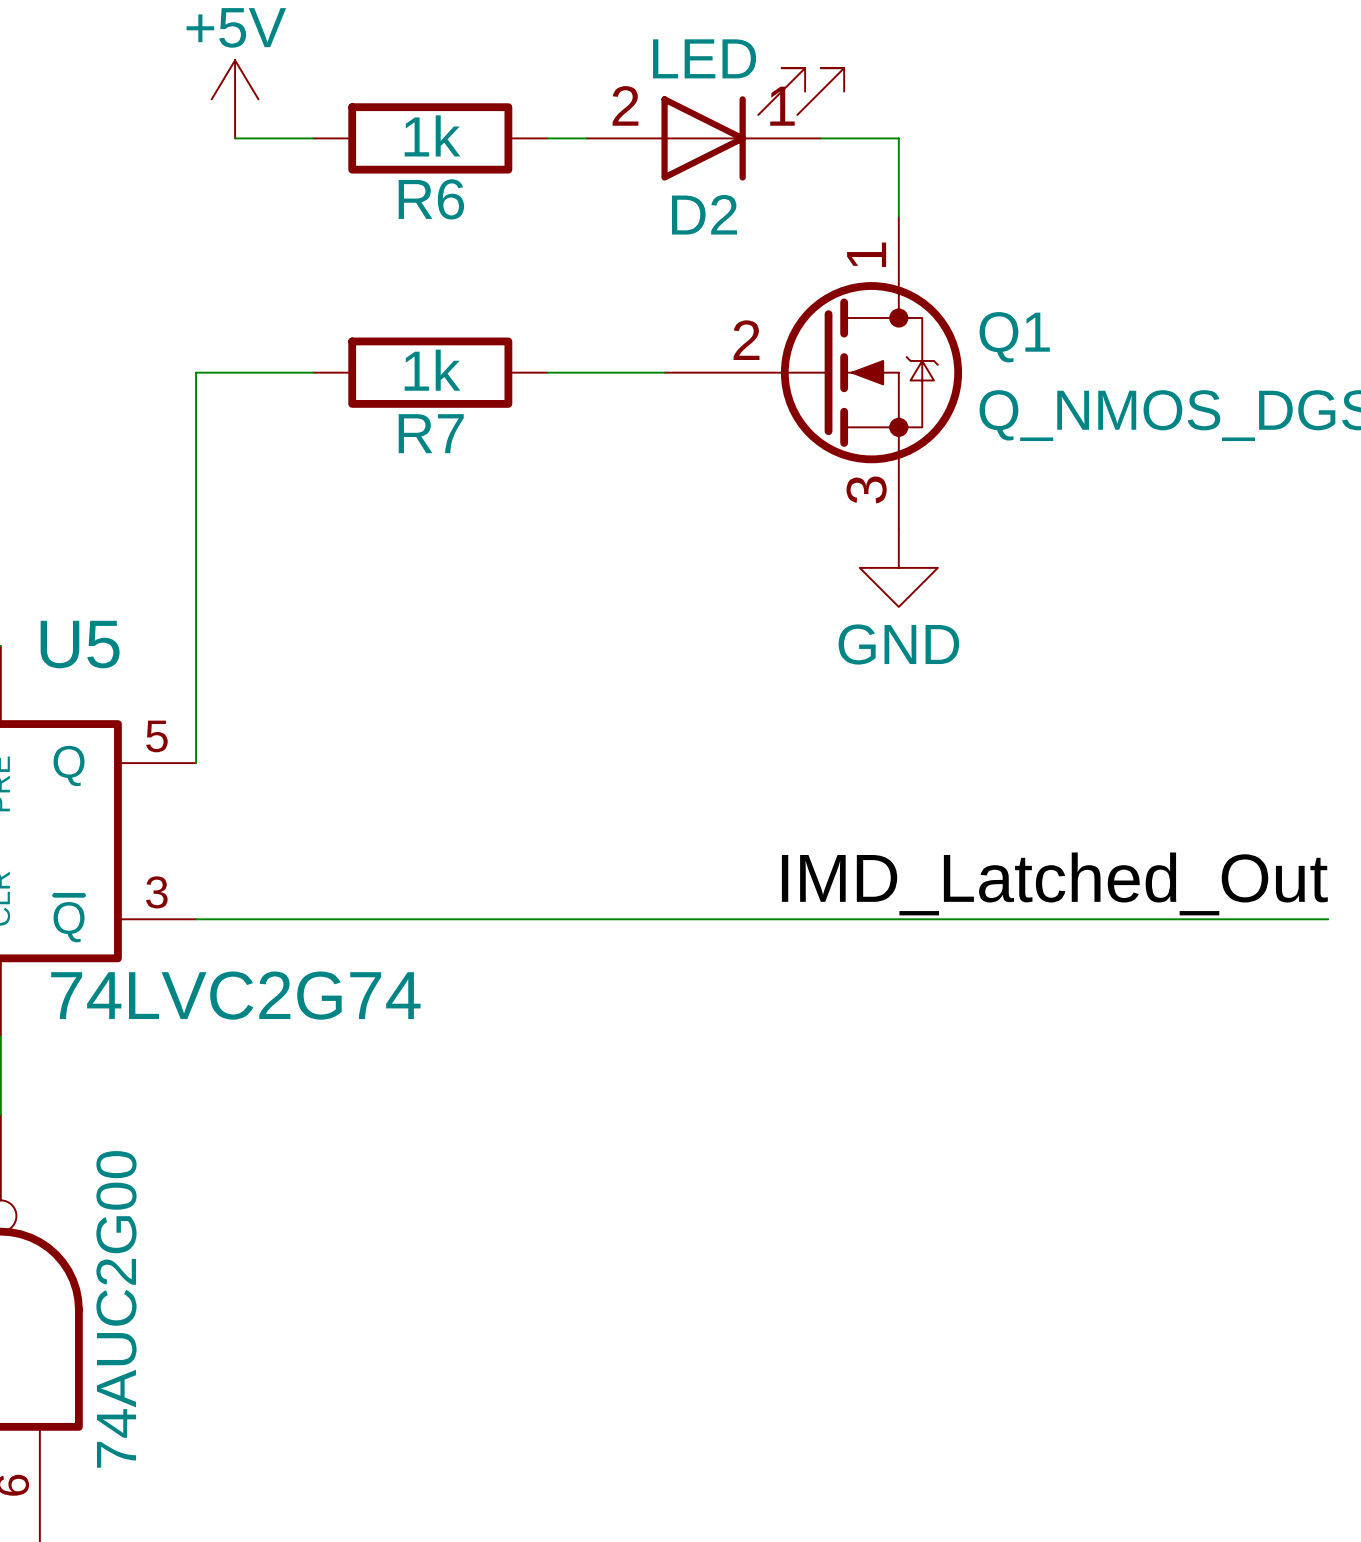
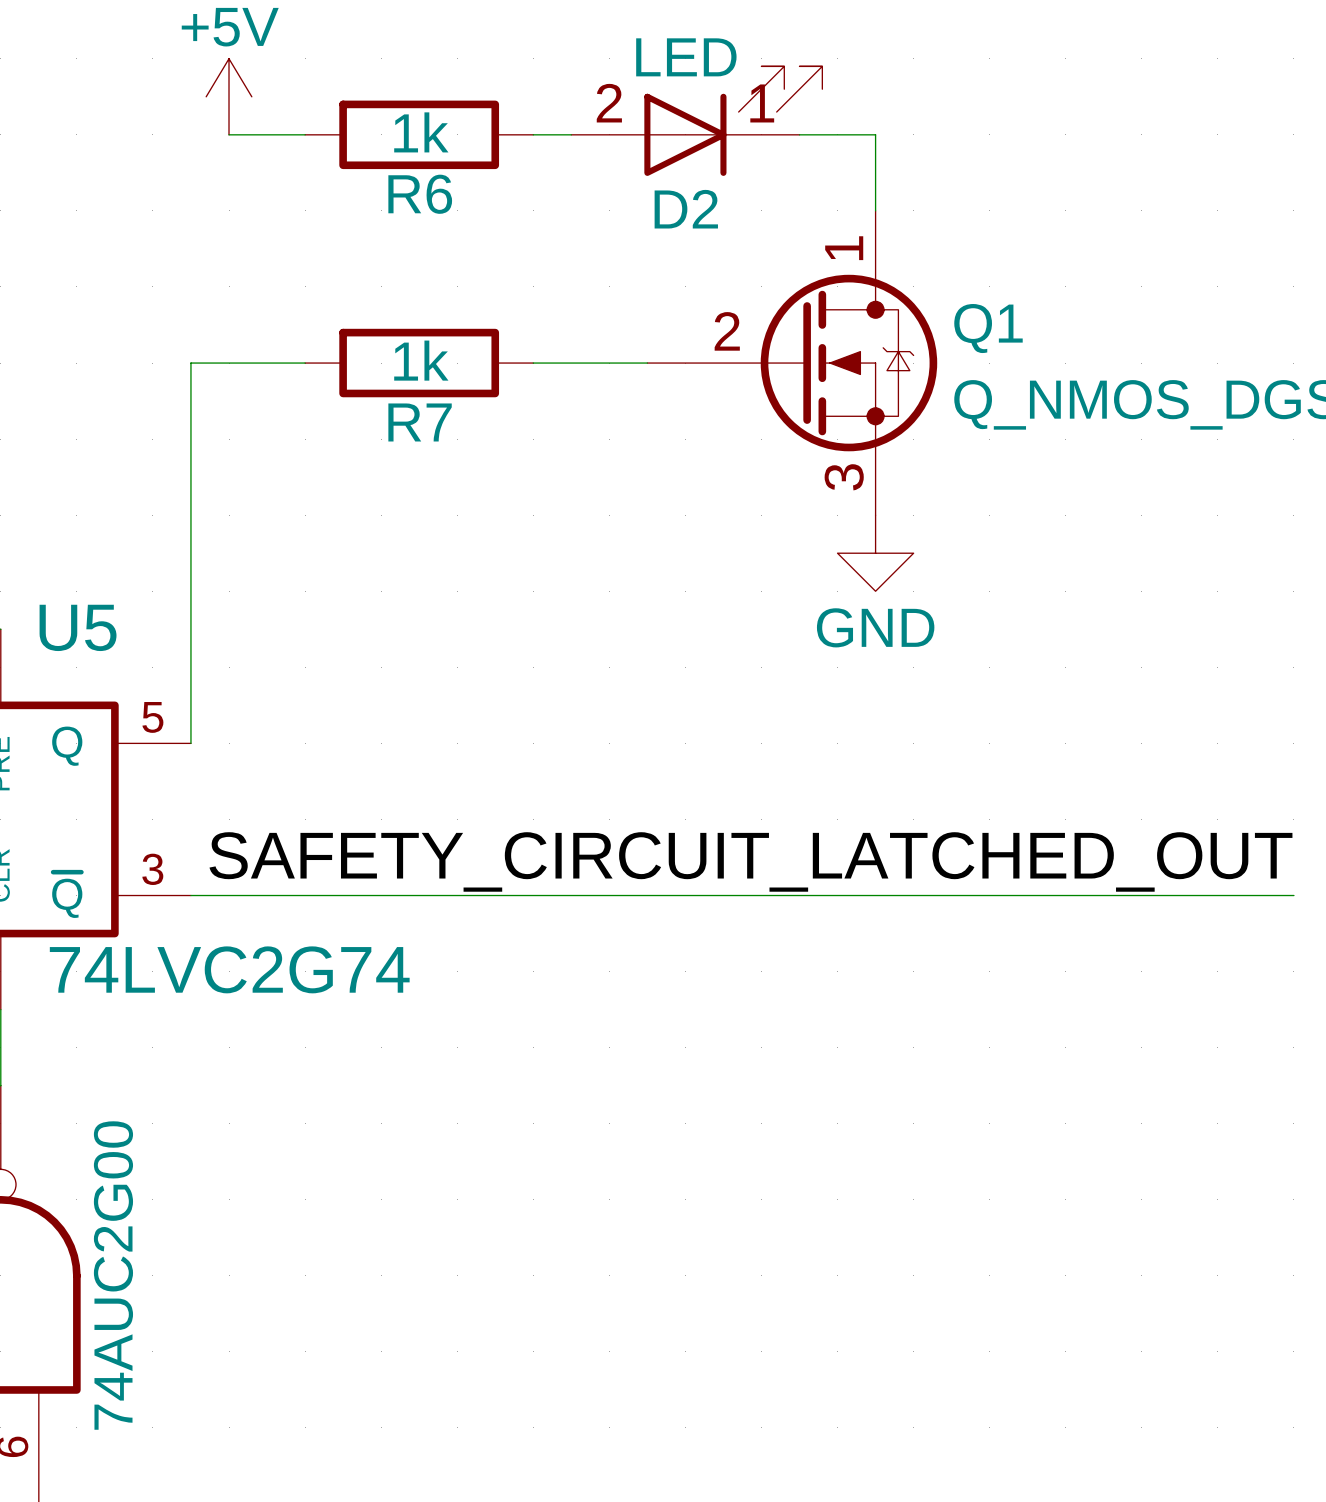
label: IMD_Latched_Out (1054, 883) -> SAFETY_CIRCUIT_LATCHED_OUT (750, 861)

